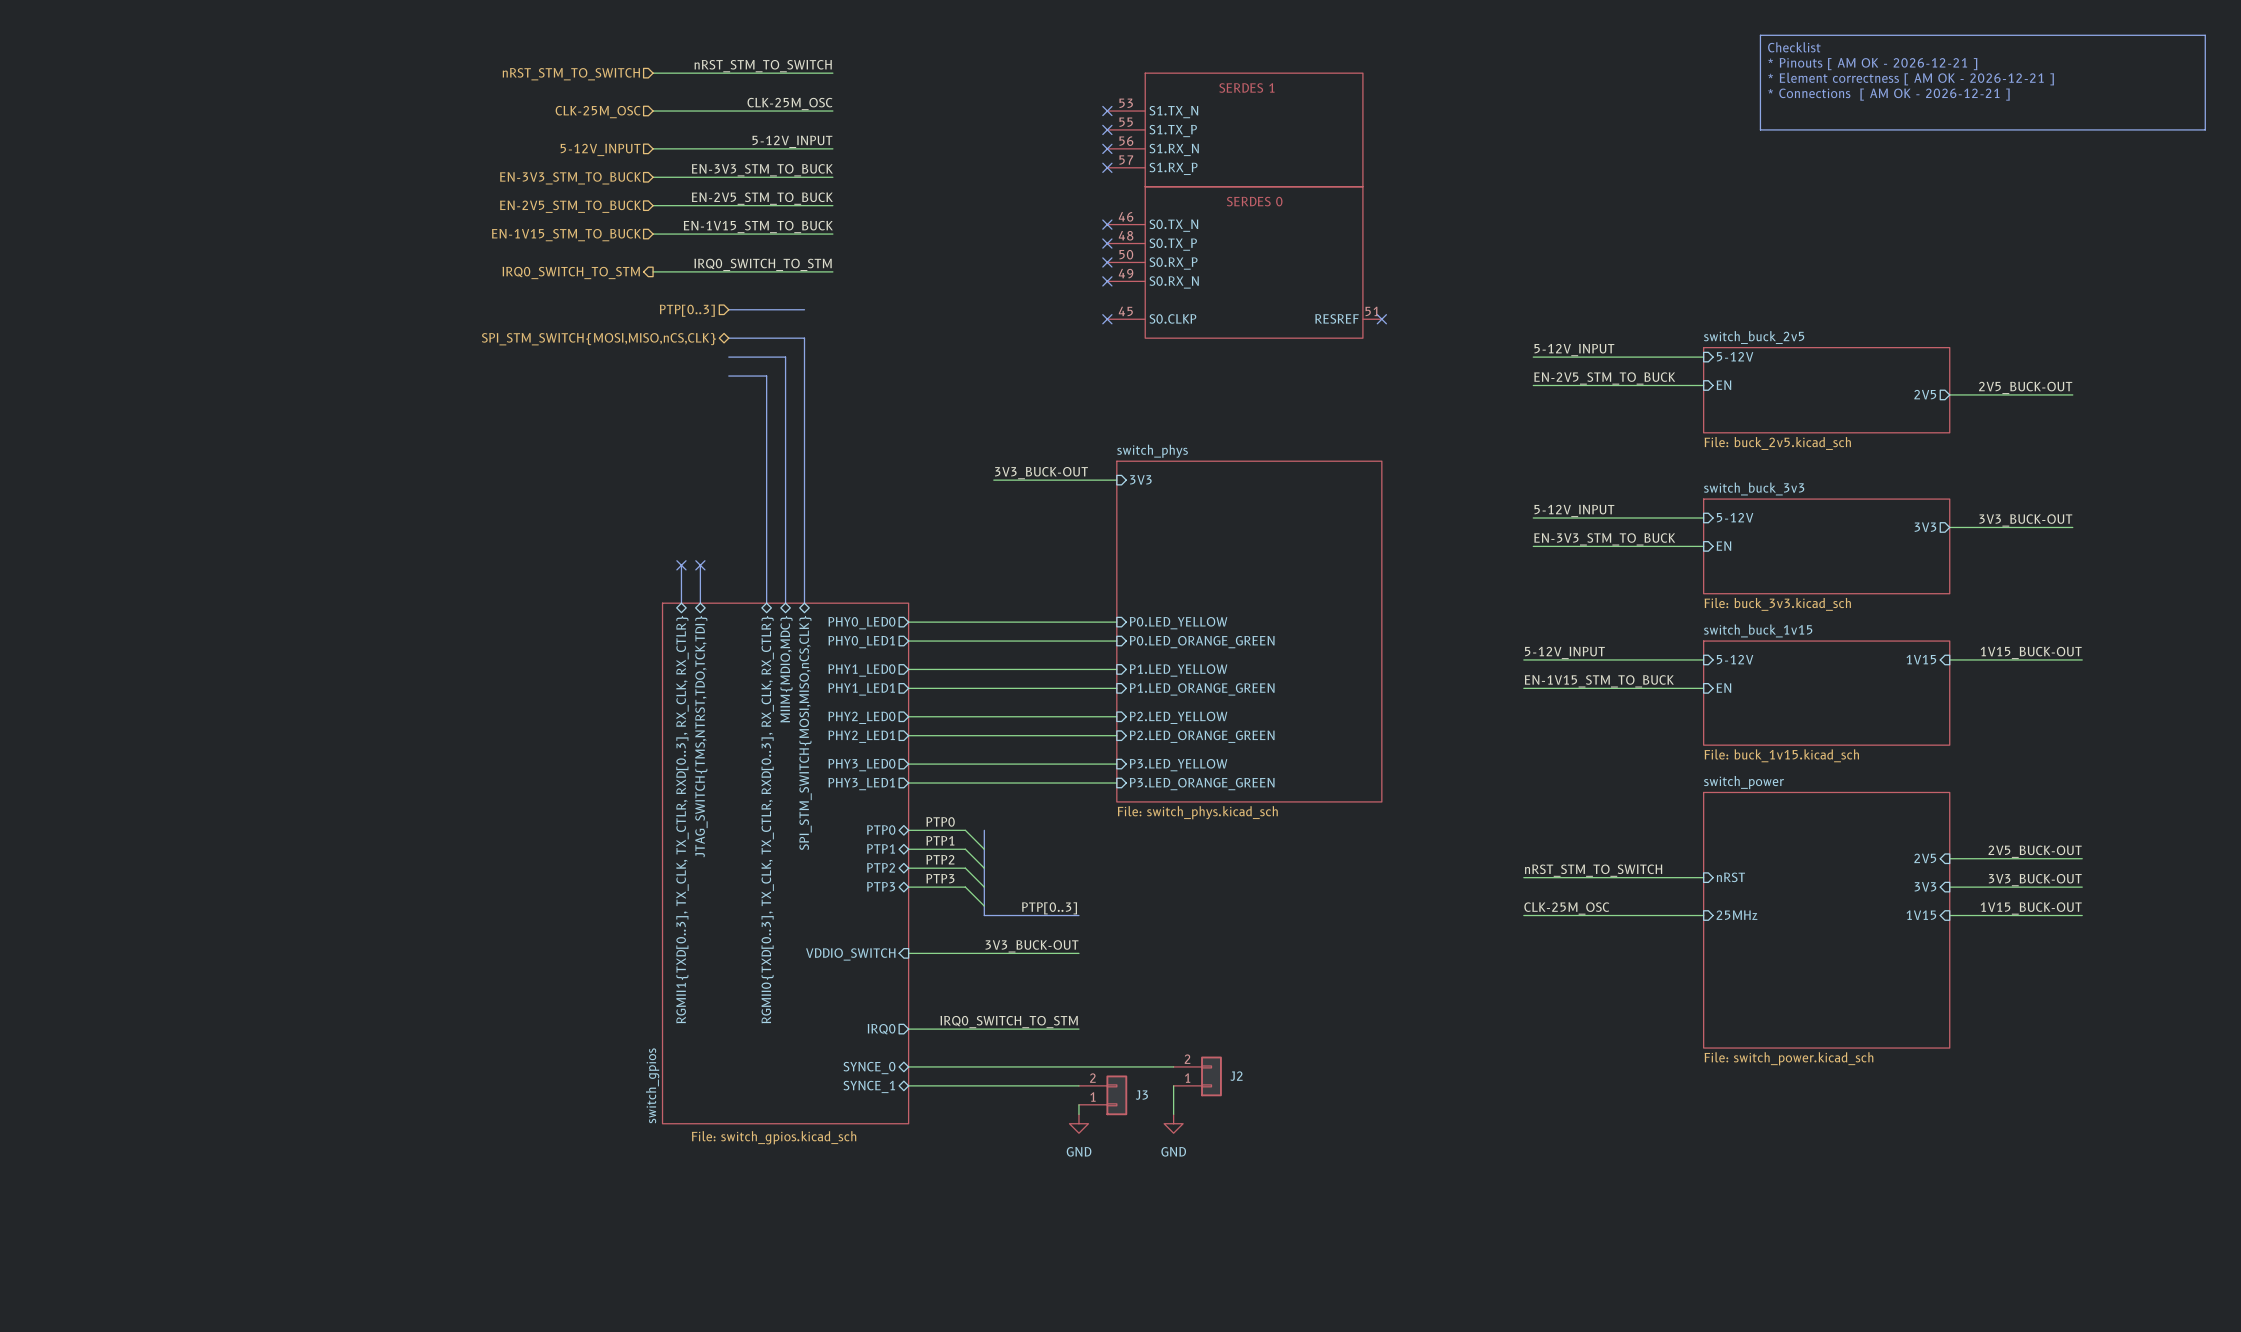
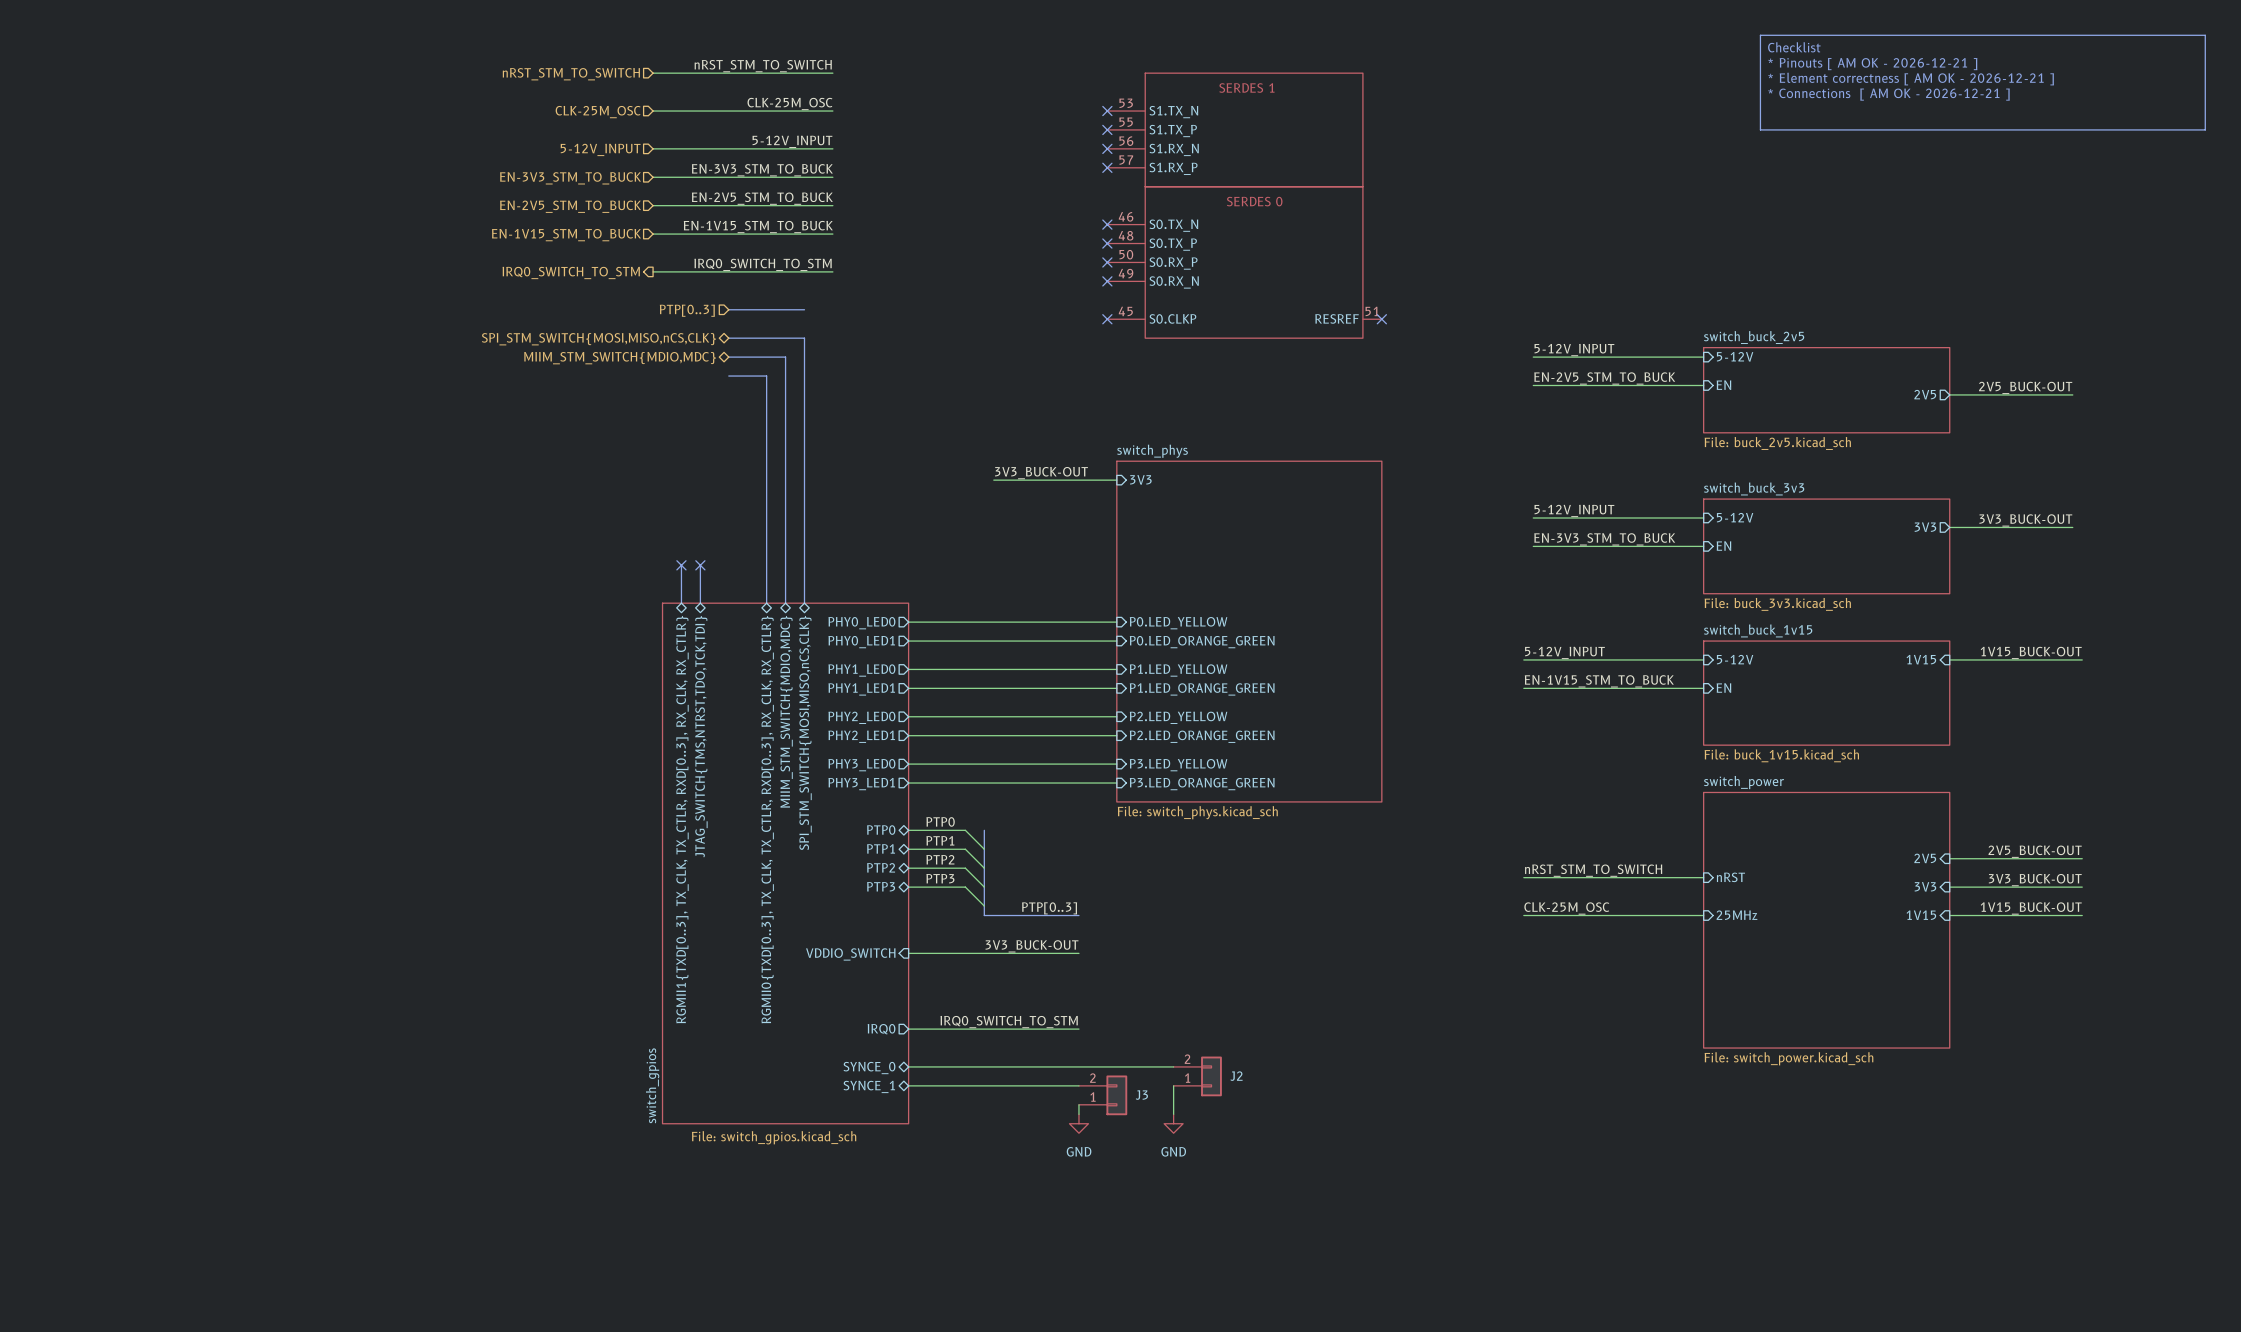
hierarchical label: none -> MIIM_STM_SWITCH{MDIO,MDC} (620, 358)
sheet pin: MIIM{MDIO,MDC} (786, 669) -> MIIM_STM_SWITCH{MDIO,MDC} (786, 711)

